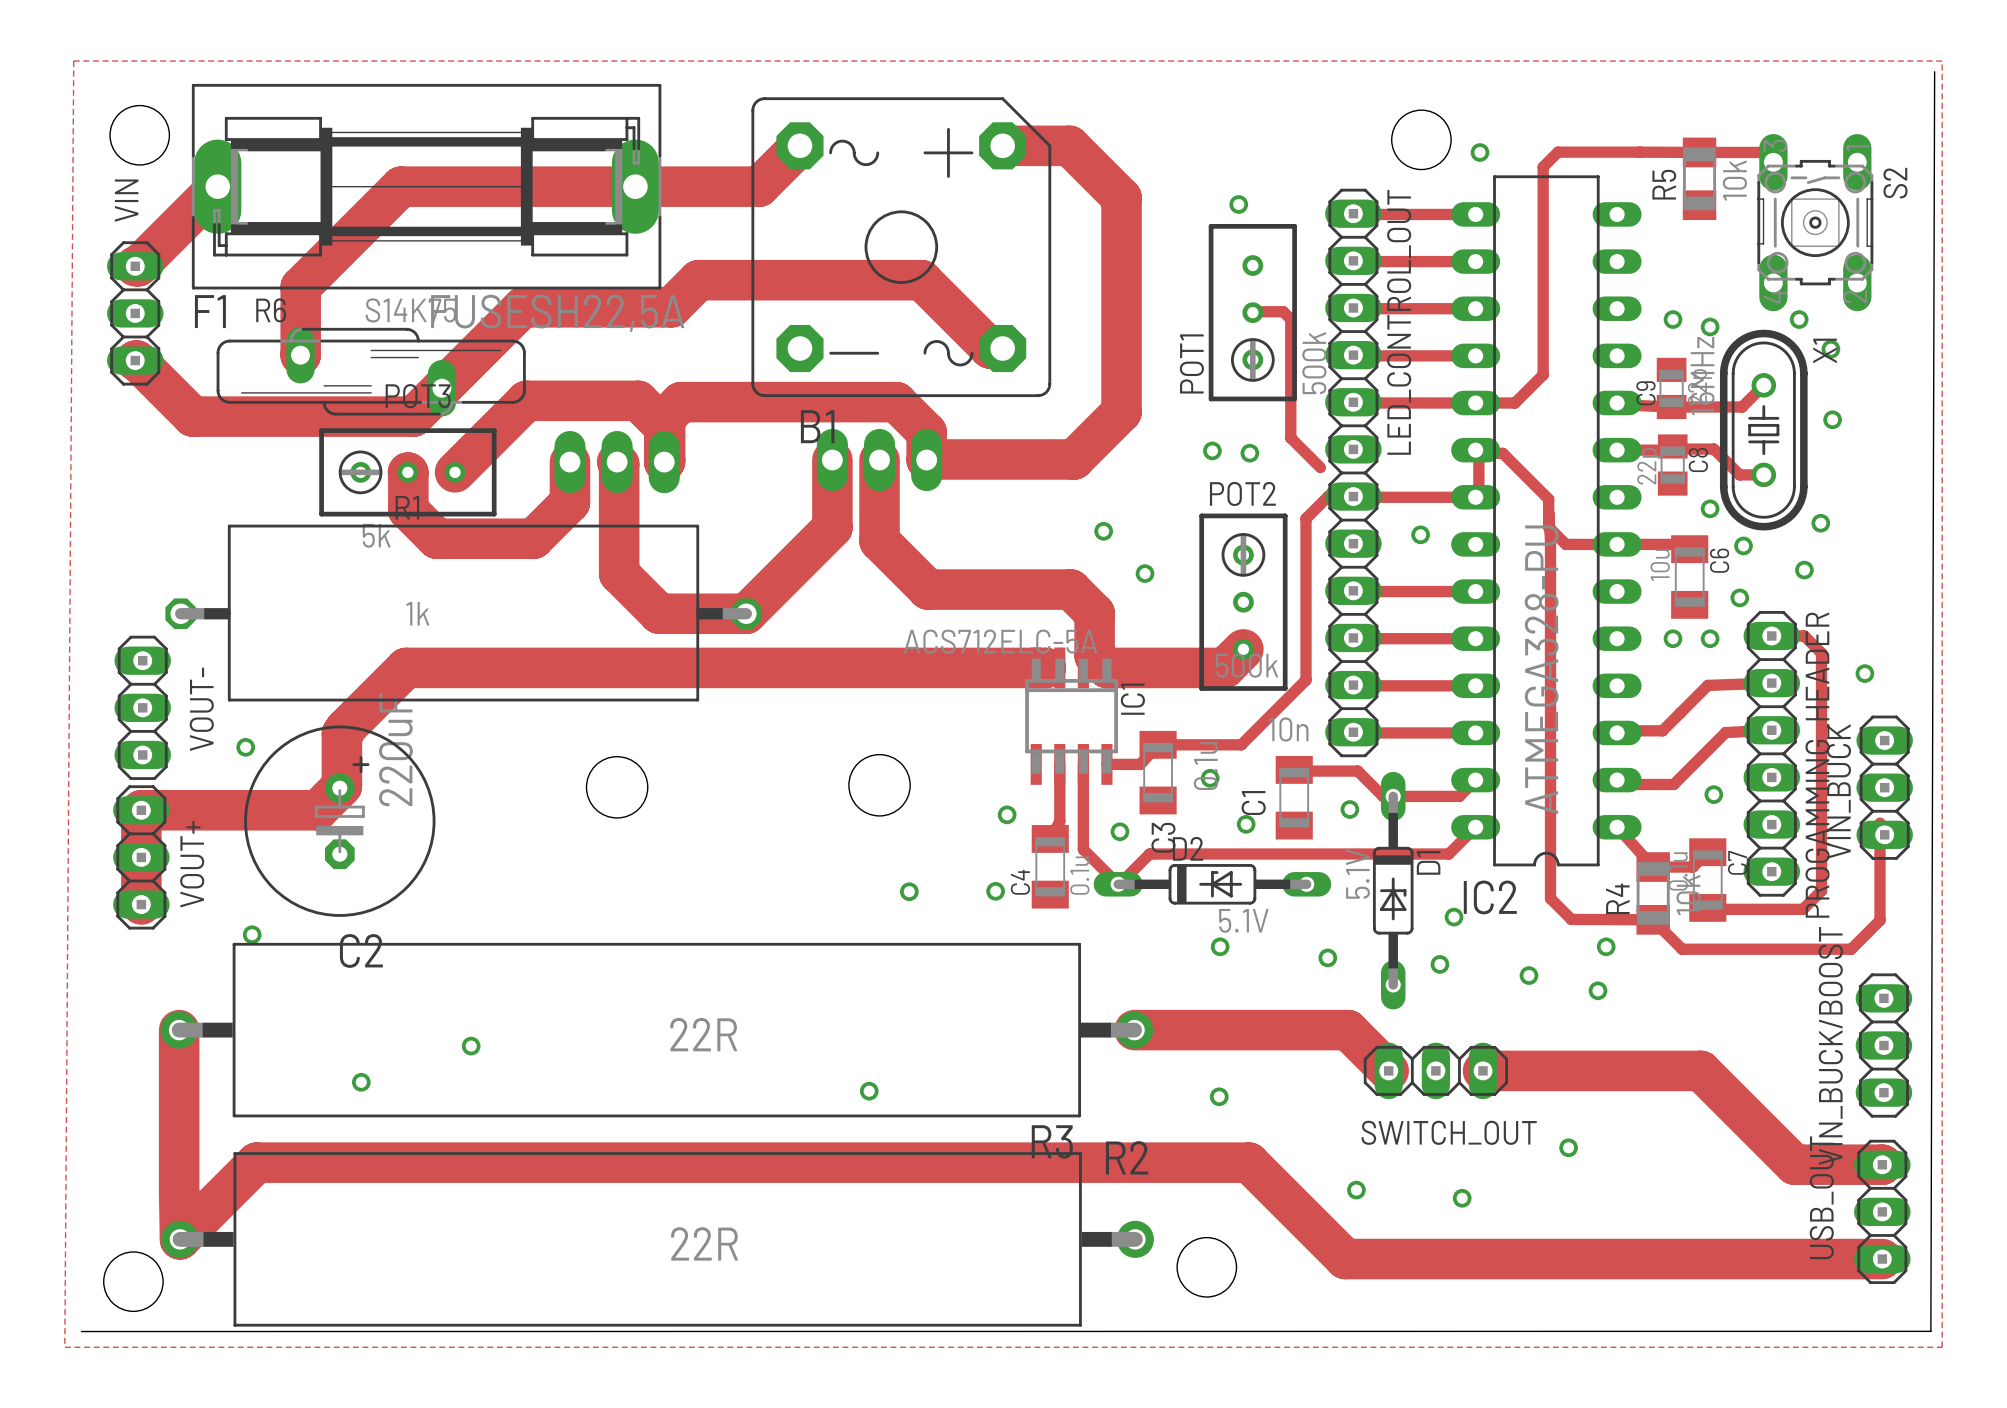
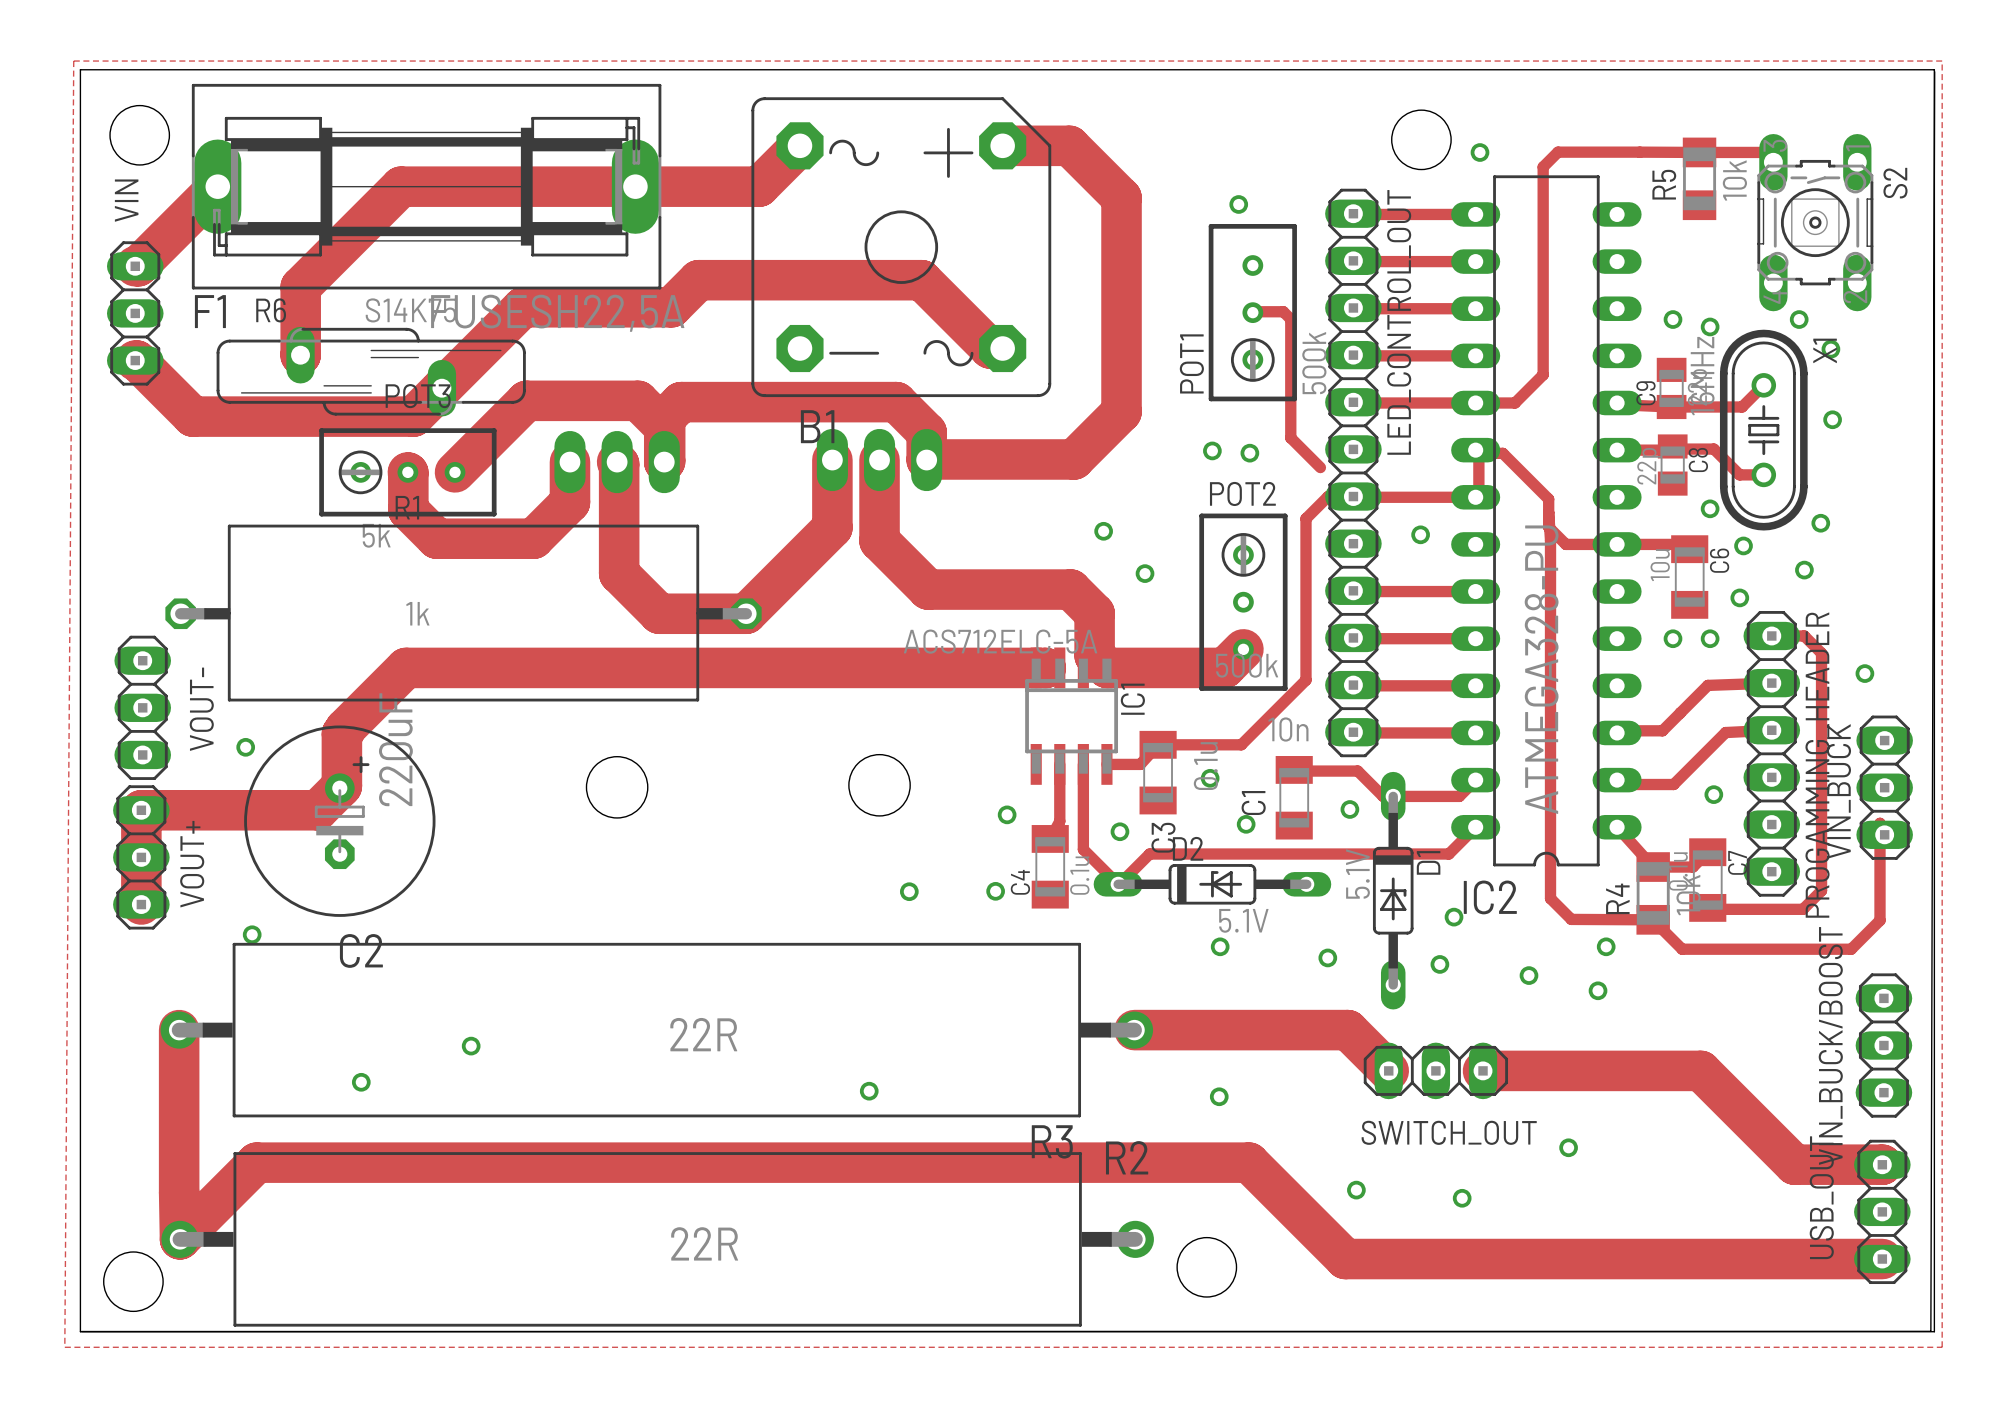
board edge: none -> (80, 69) (80, 1331) (1934, 1331) (1934, 69) (80, 69)

